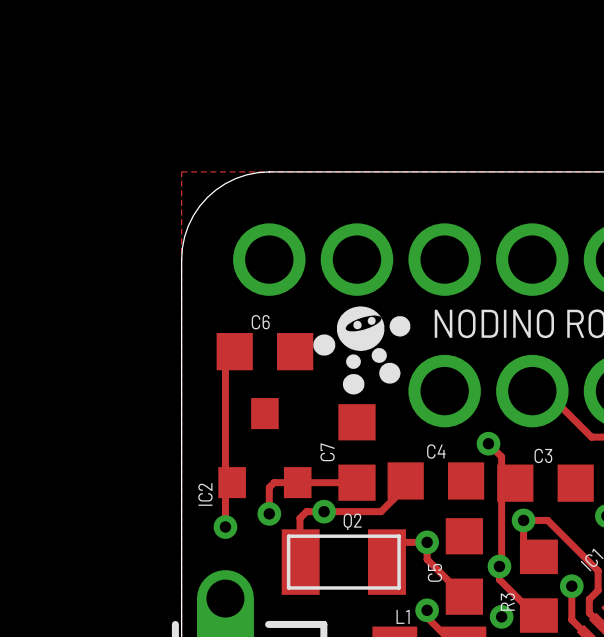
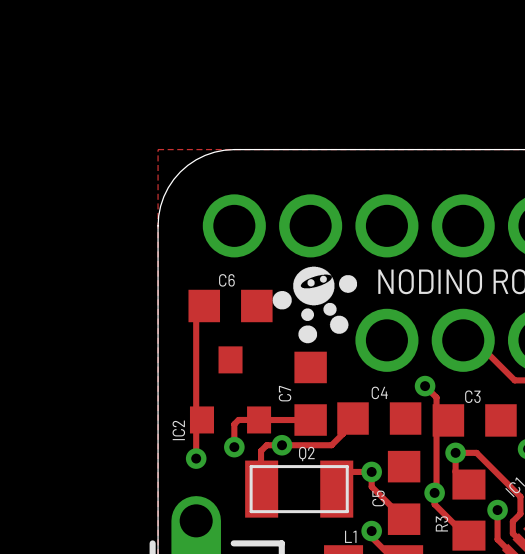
via: (501, 616) -> none

